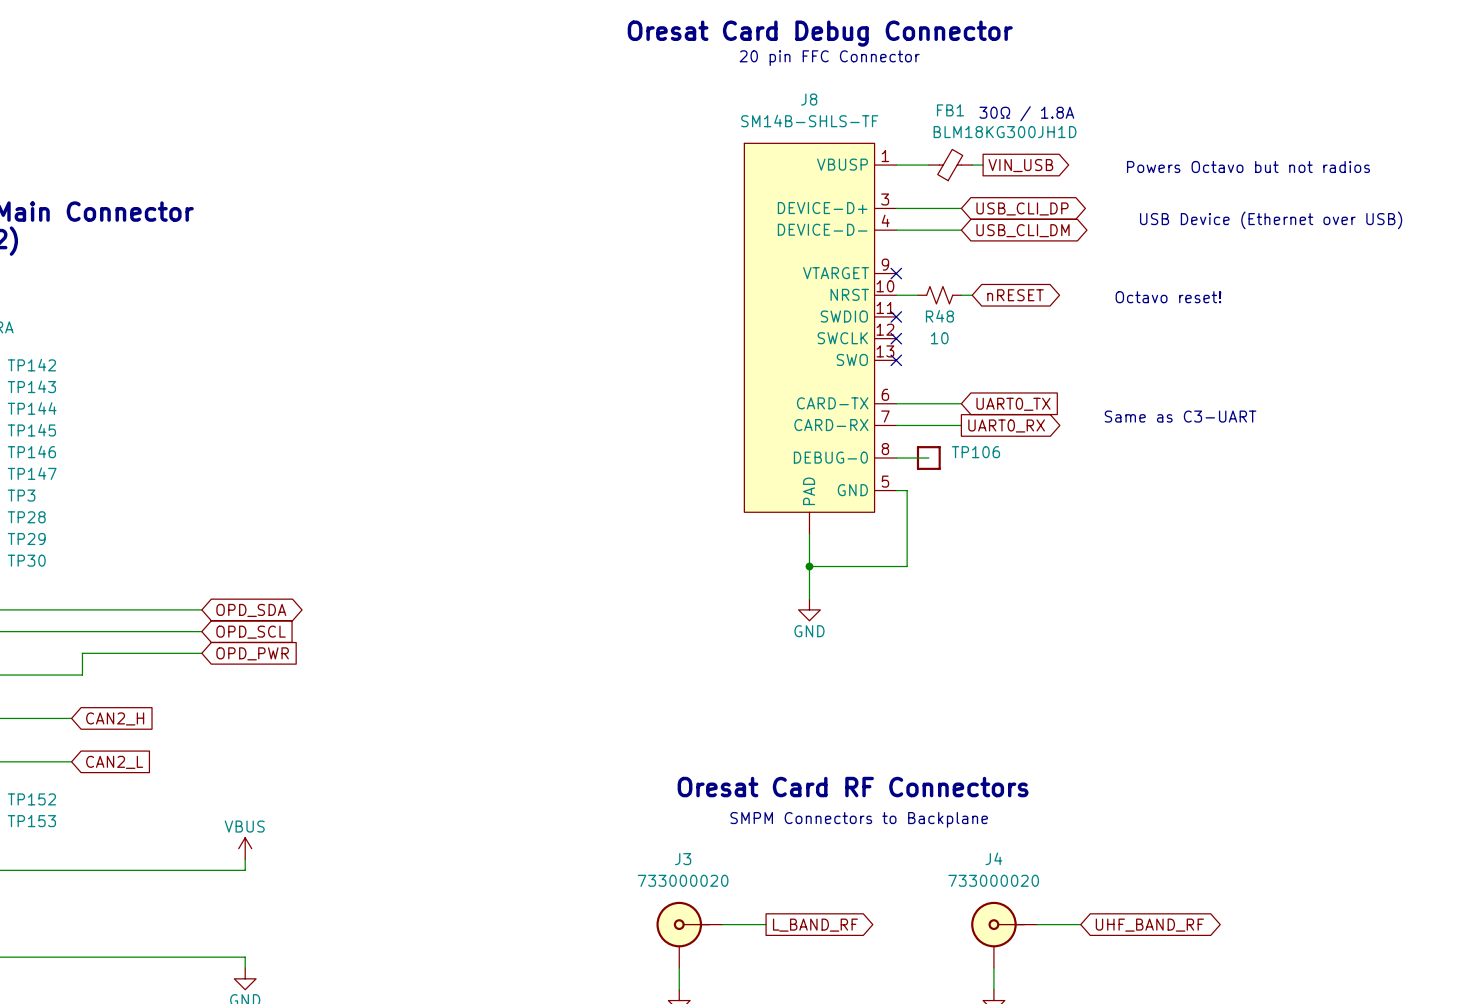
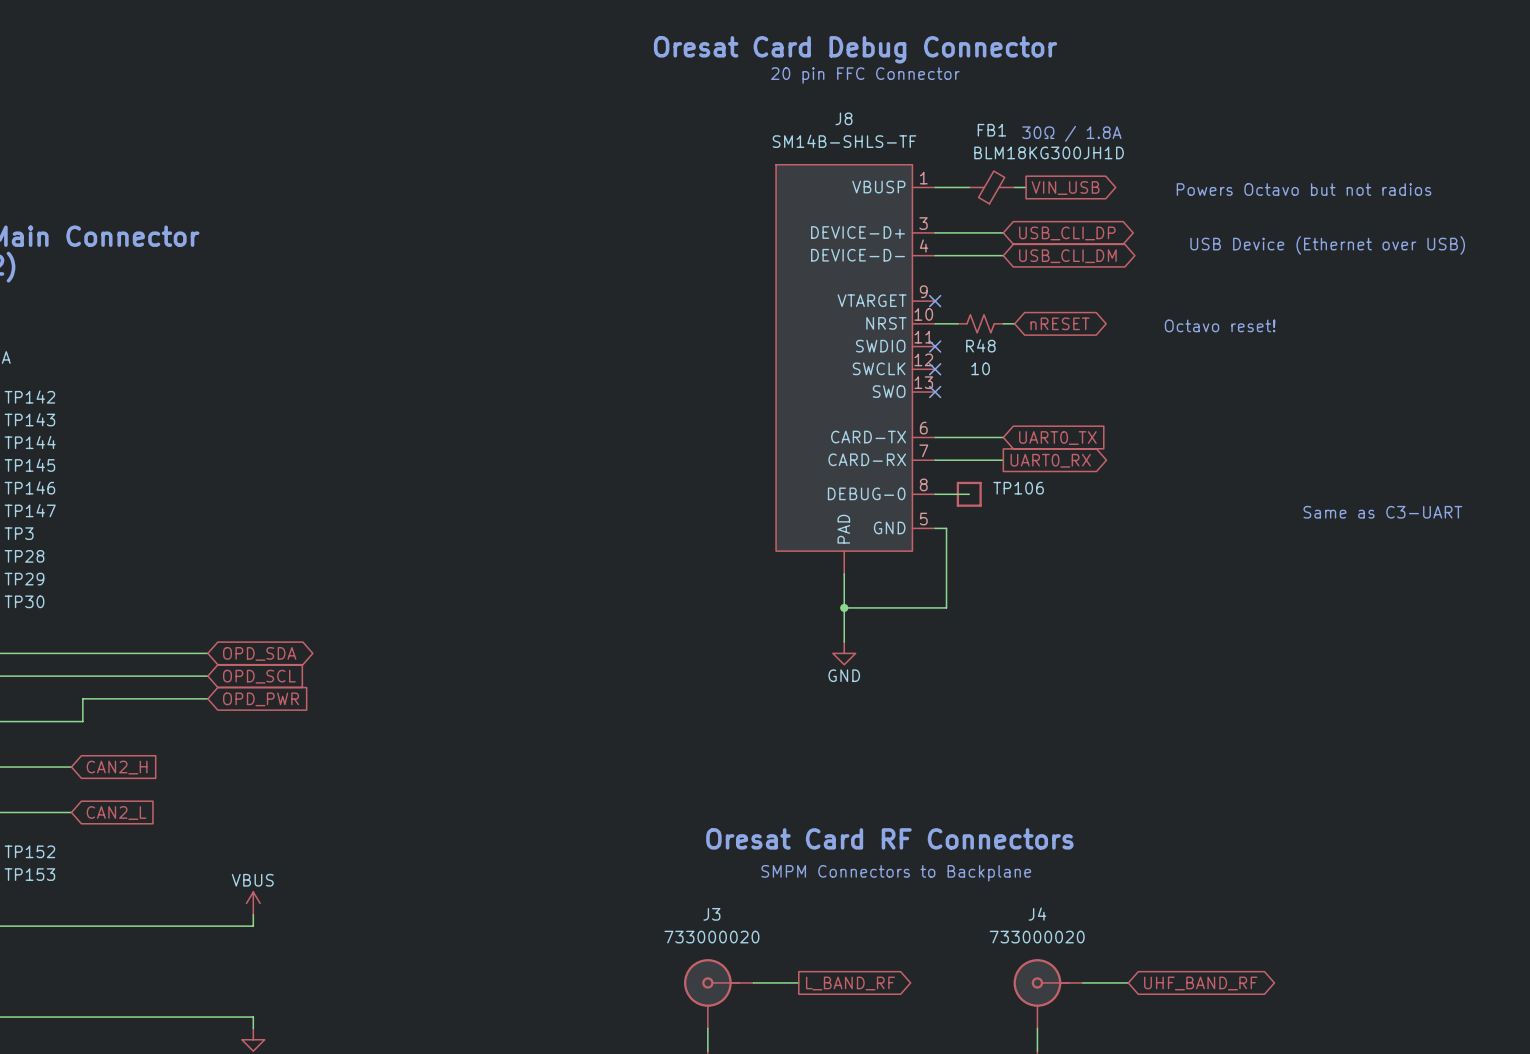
text position: Same as C3-UART (1180, 416) -> Same as C3-UART (1382, 512)

